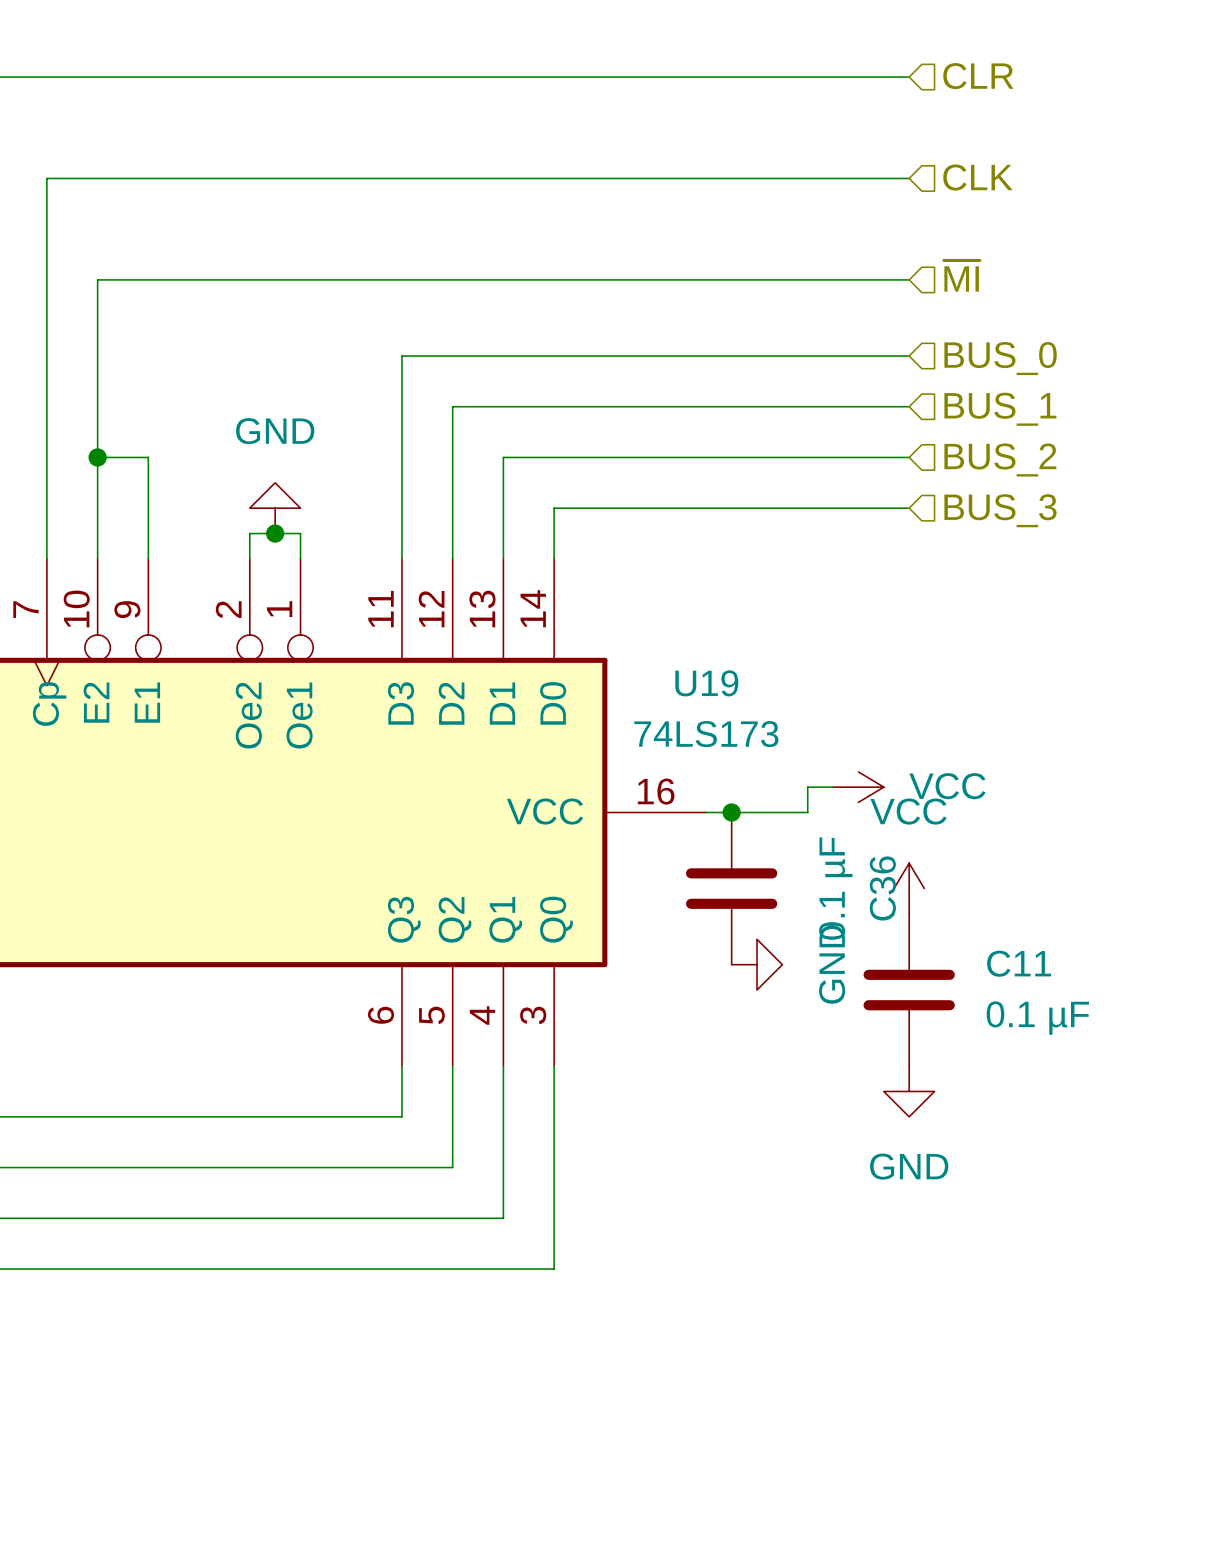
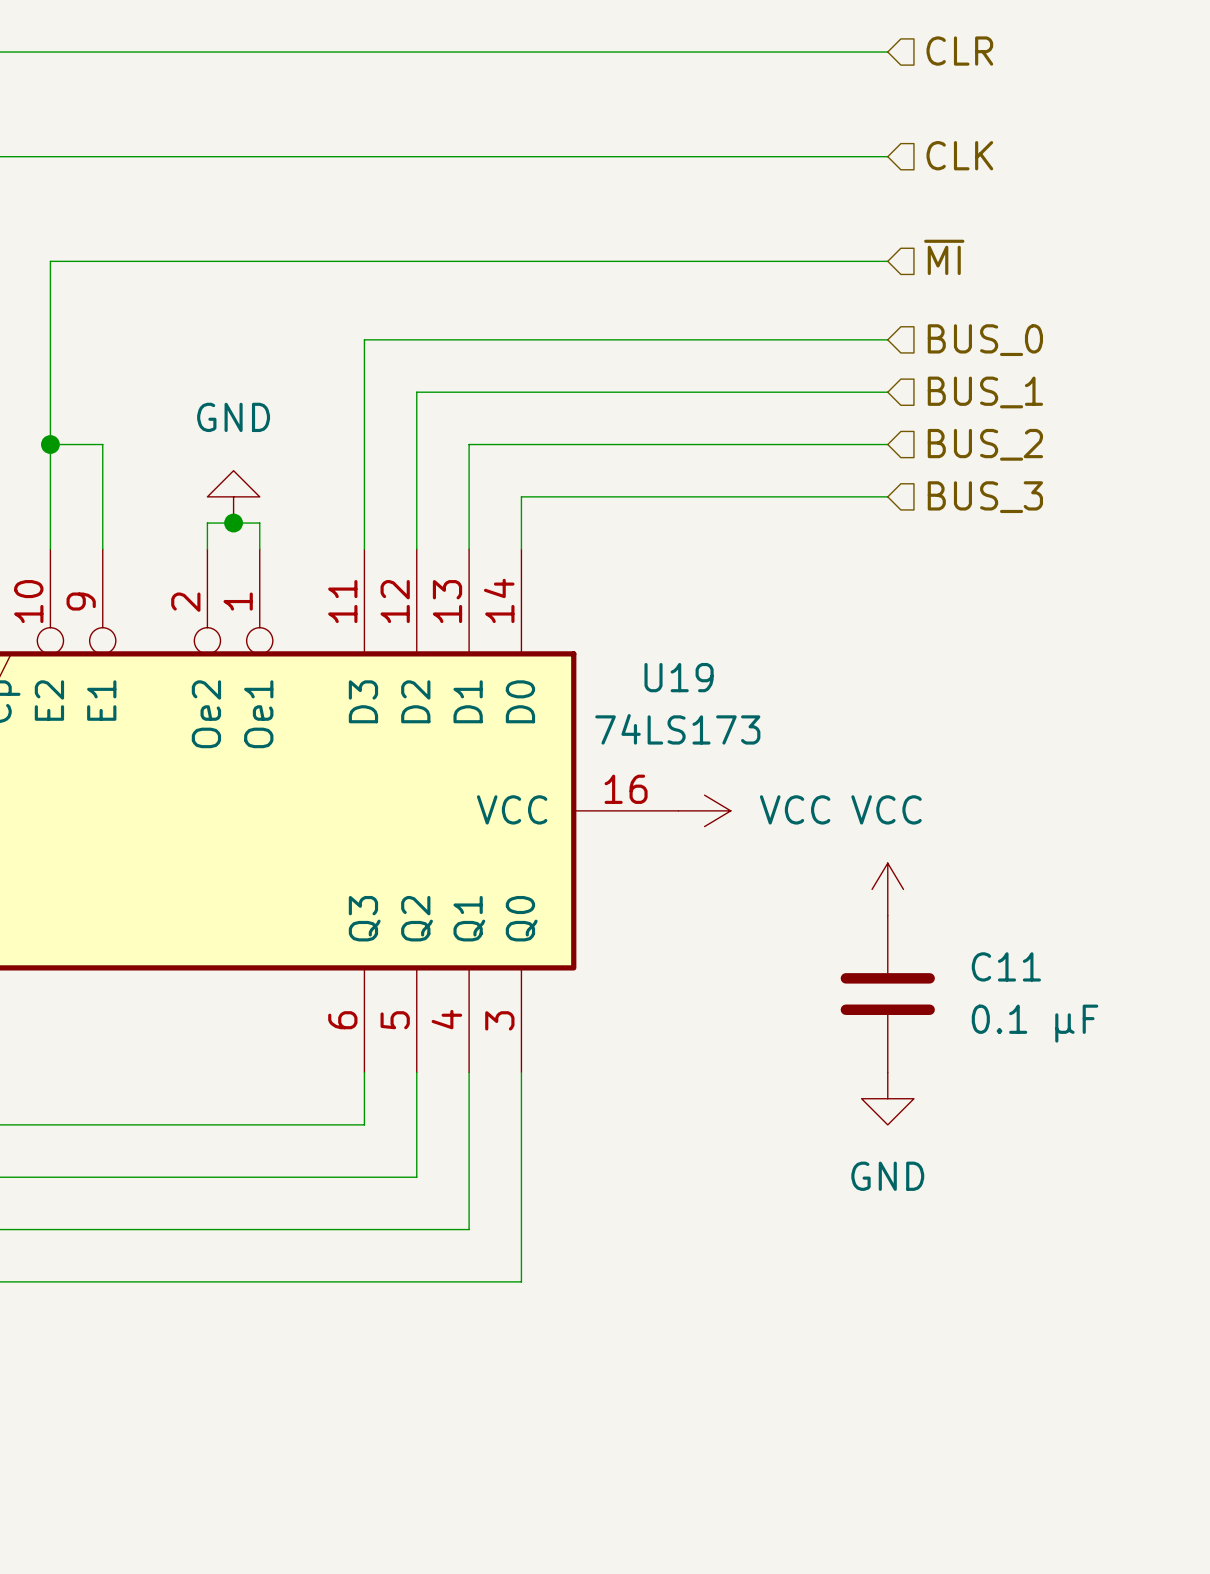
wire: (833, 787) (807, 787) (807, 812) (706, 812) -> none
power symbol position: VCC (858, 787) -> VCC (704, 810)
junction: (731, 812) -> none
C36: 0.1 µF (731, 888) -> none
power symbol: GND (757, 964) -> none

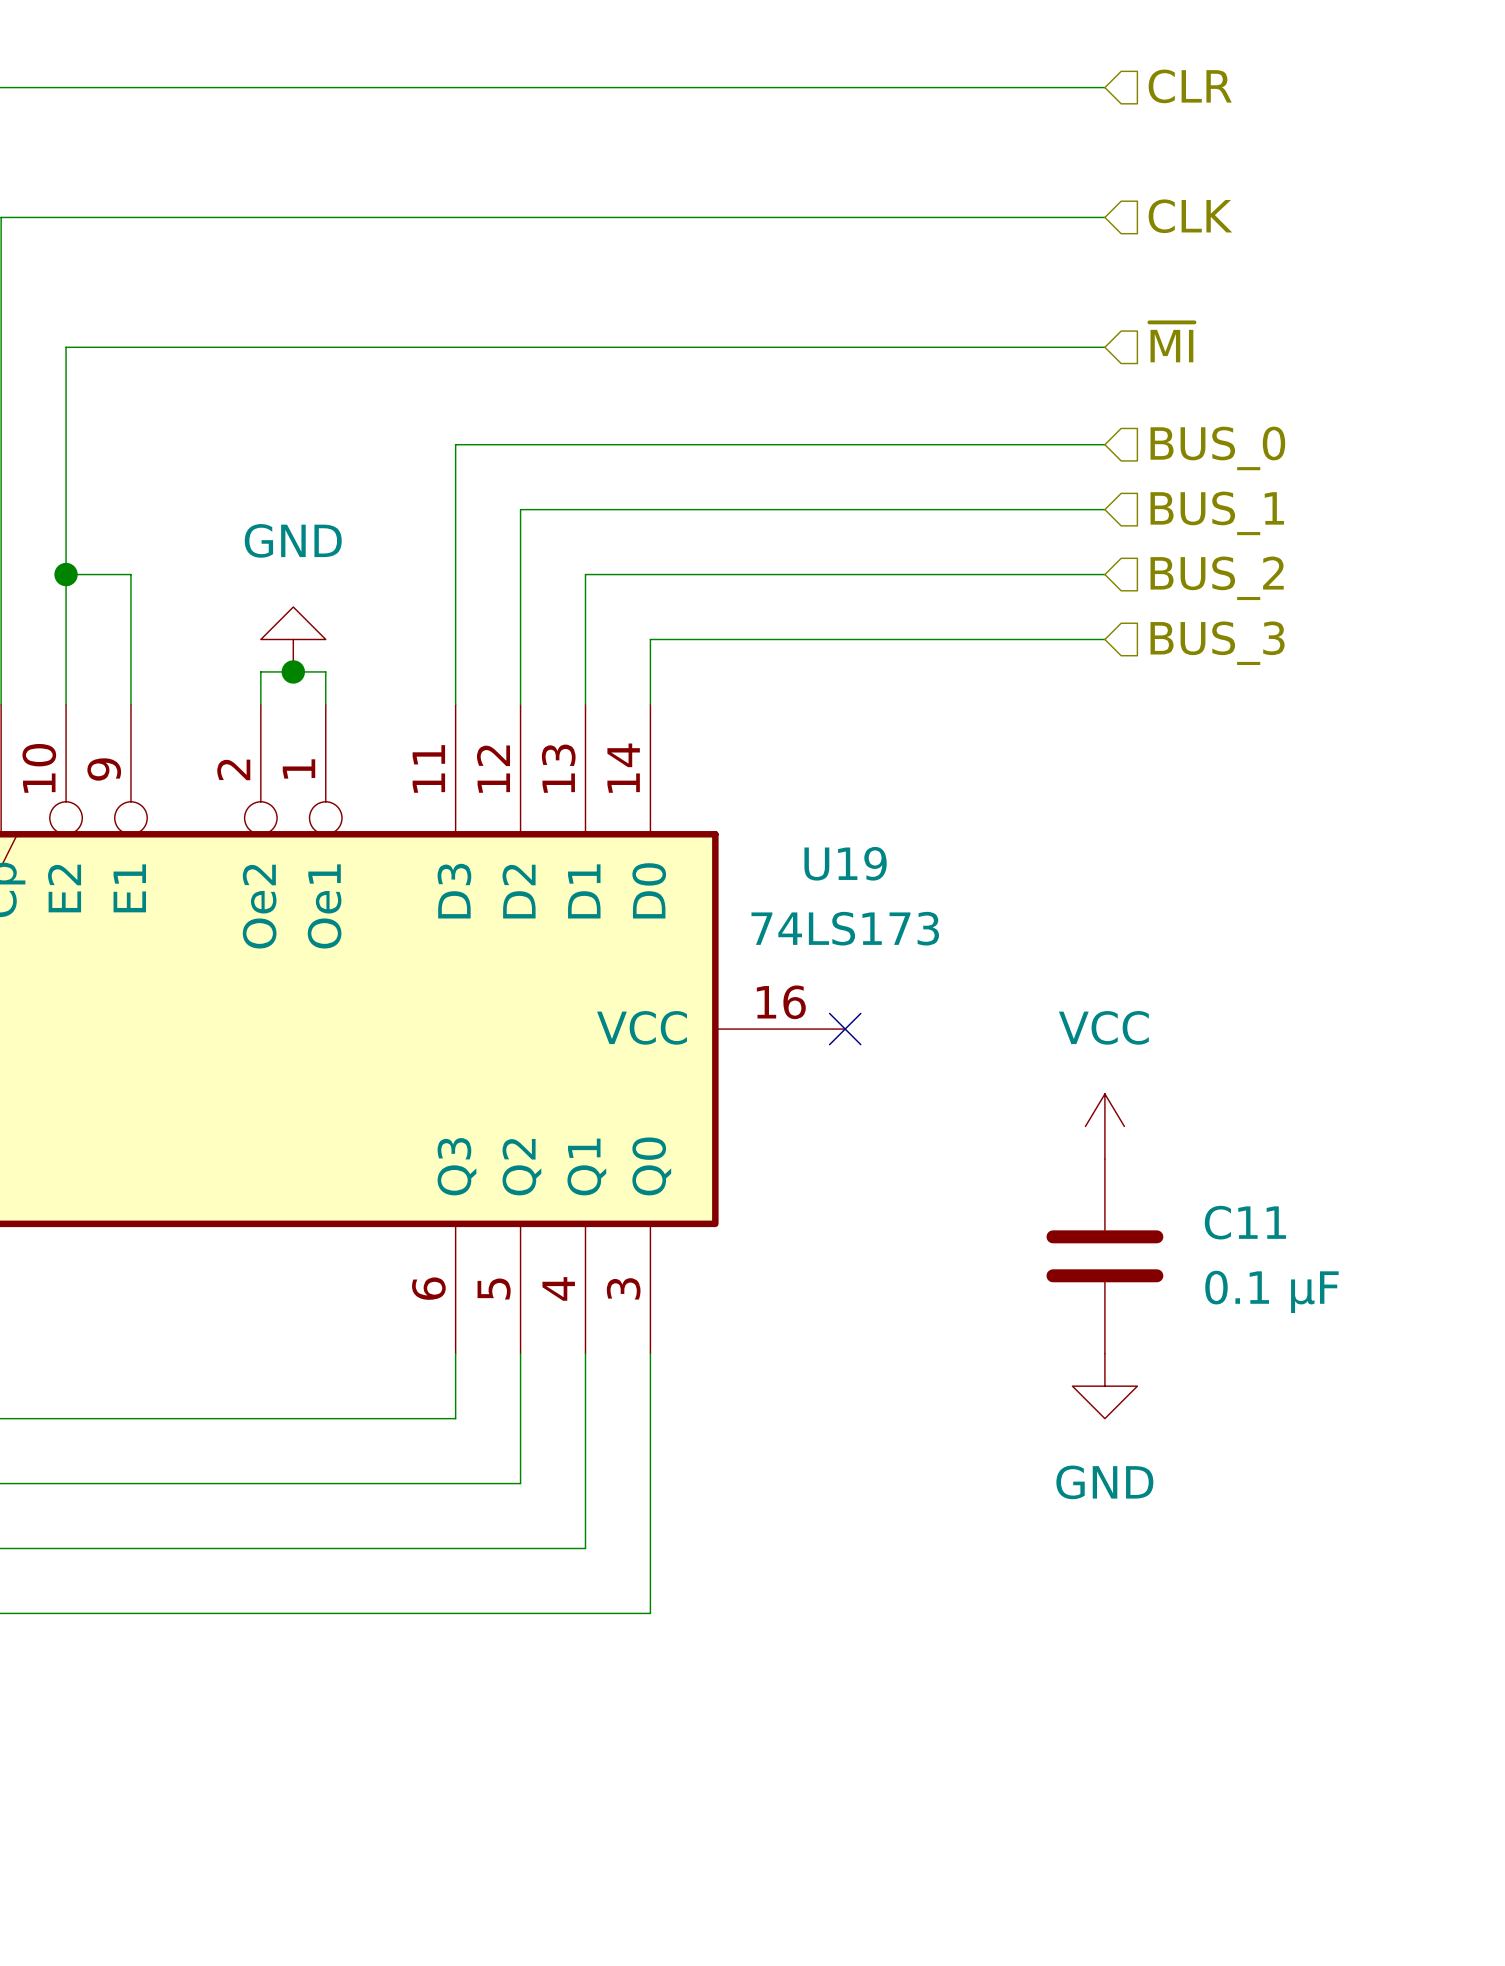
no-connect mark: none -> (845, 1029)
power symbol: VCC (704, 810) -> none

